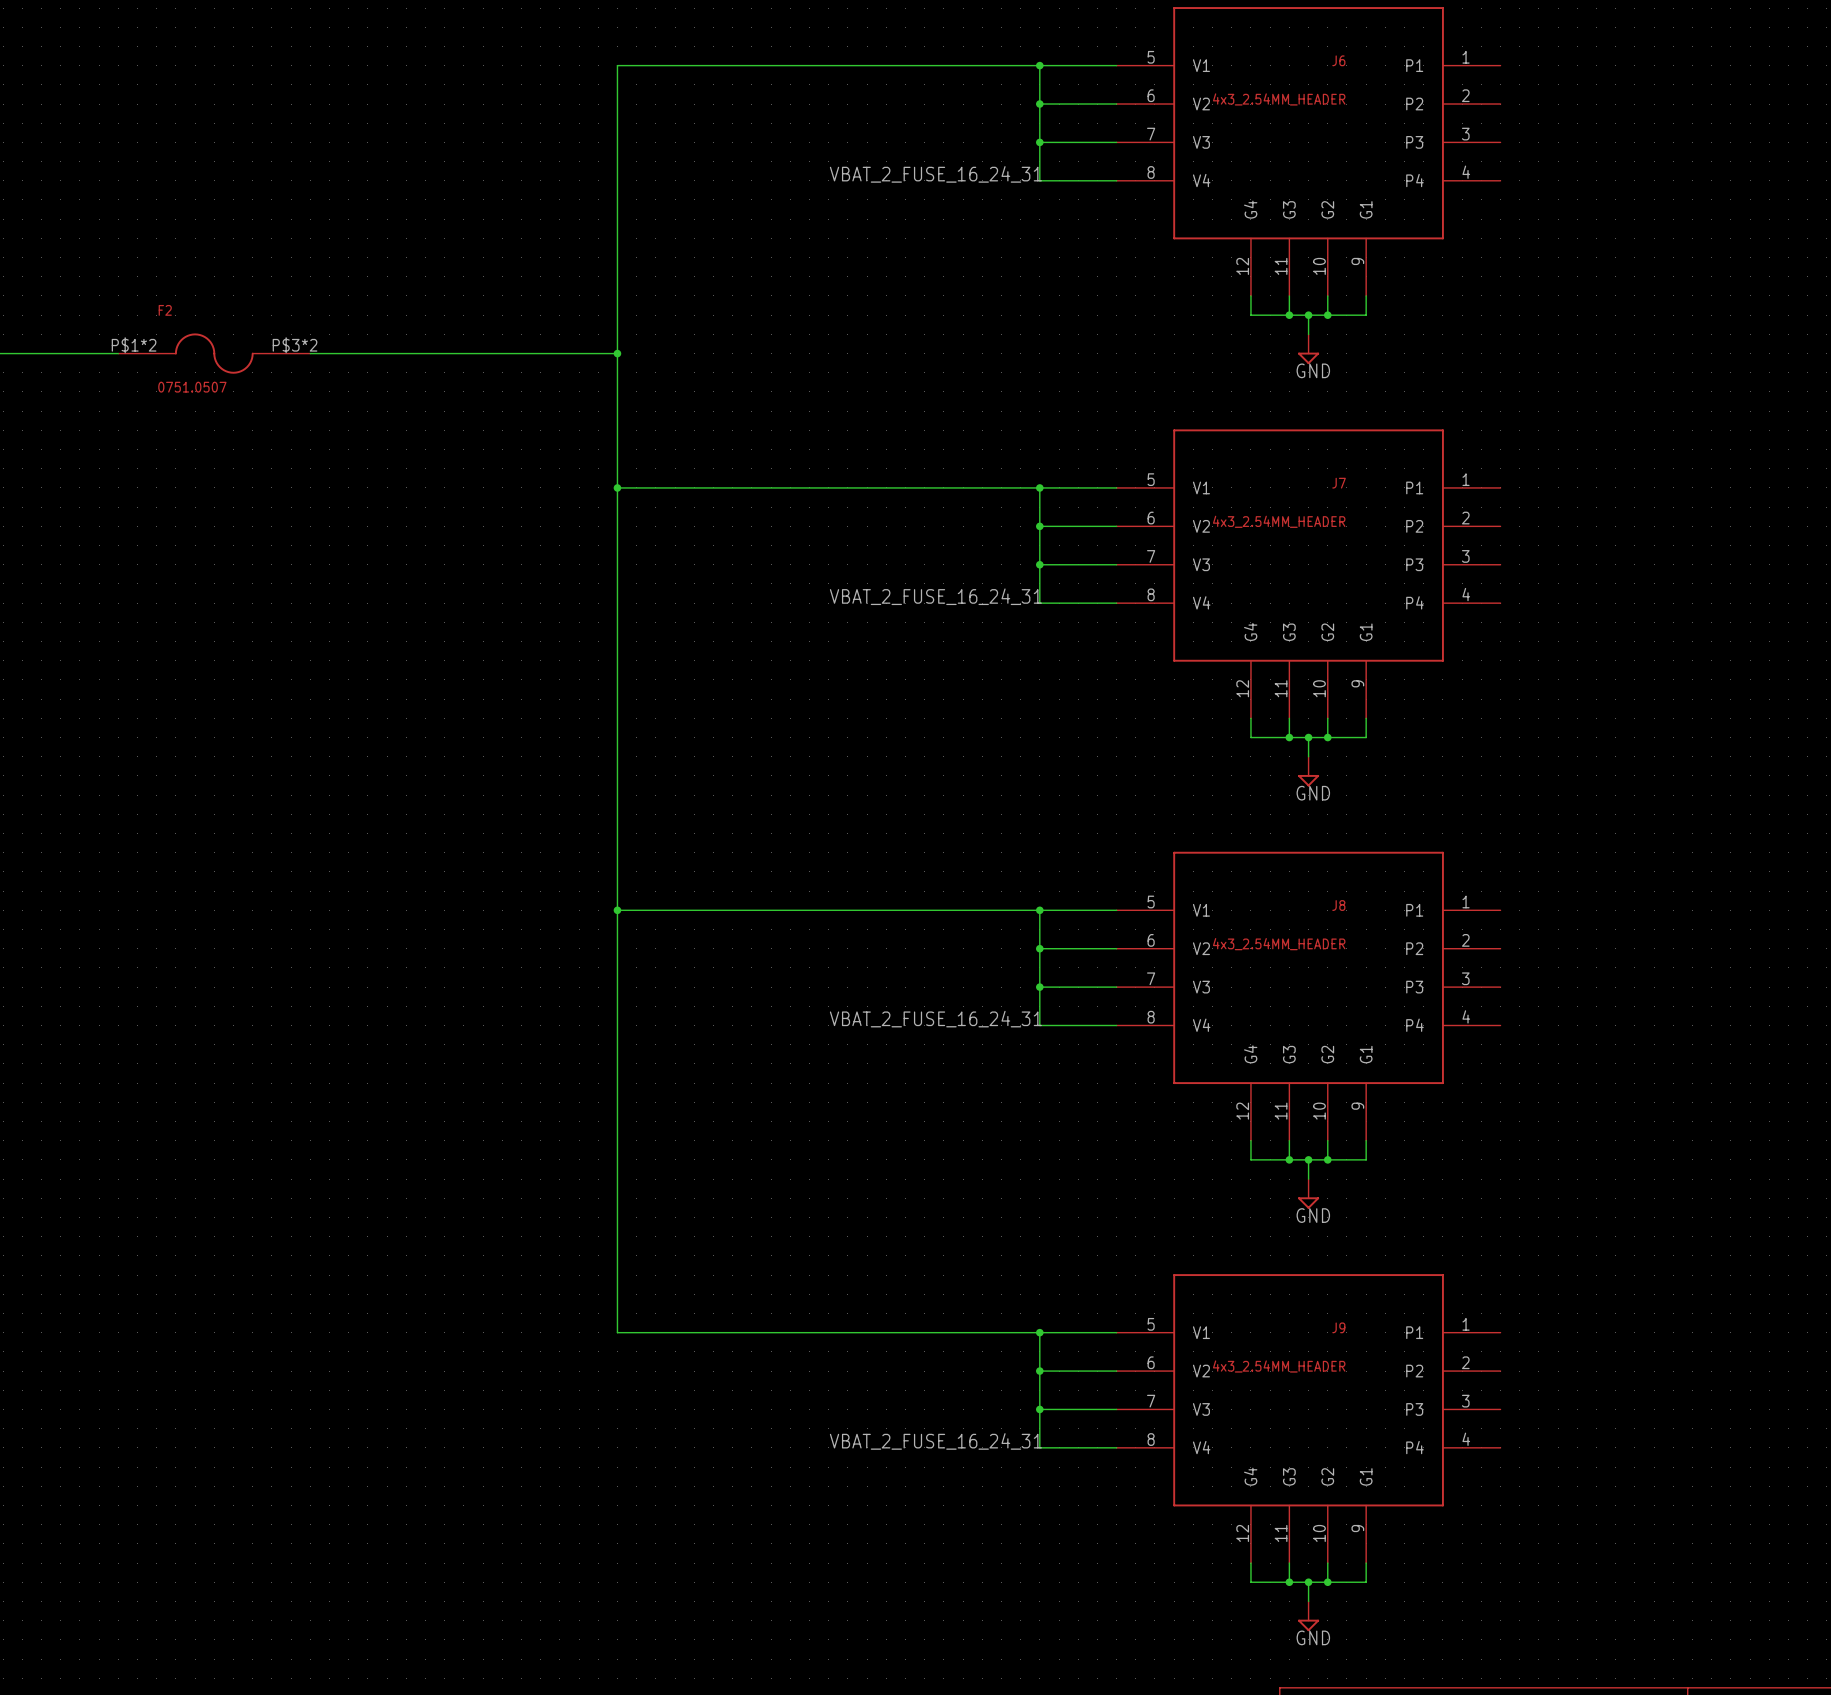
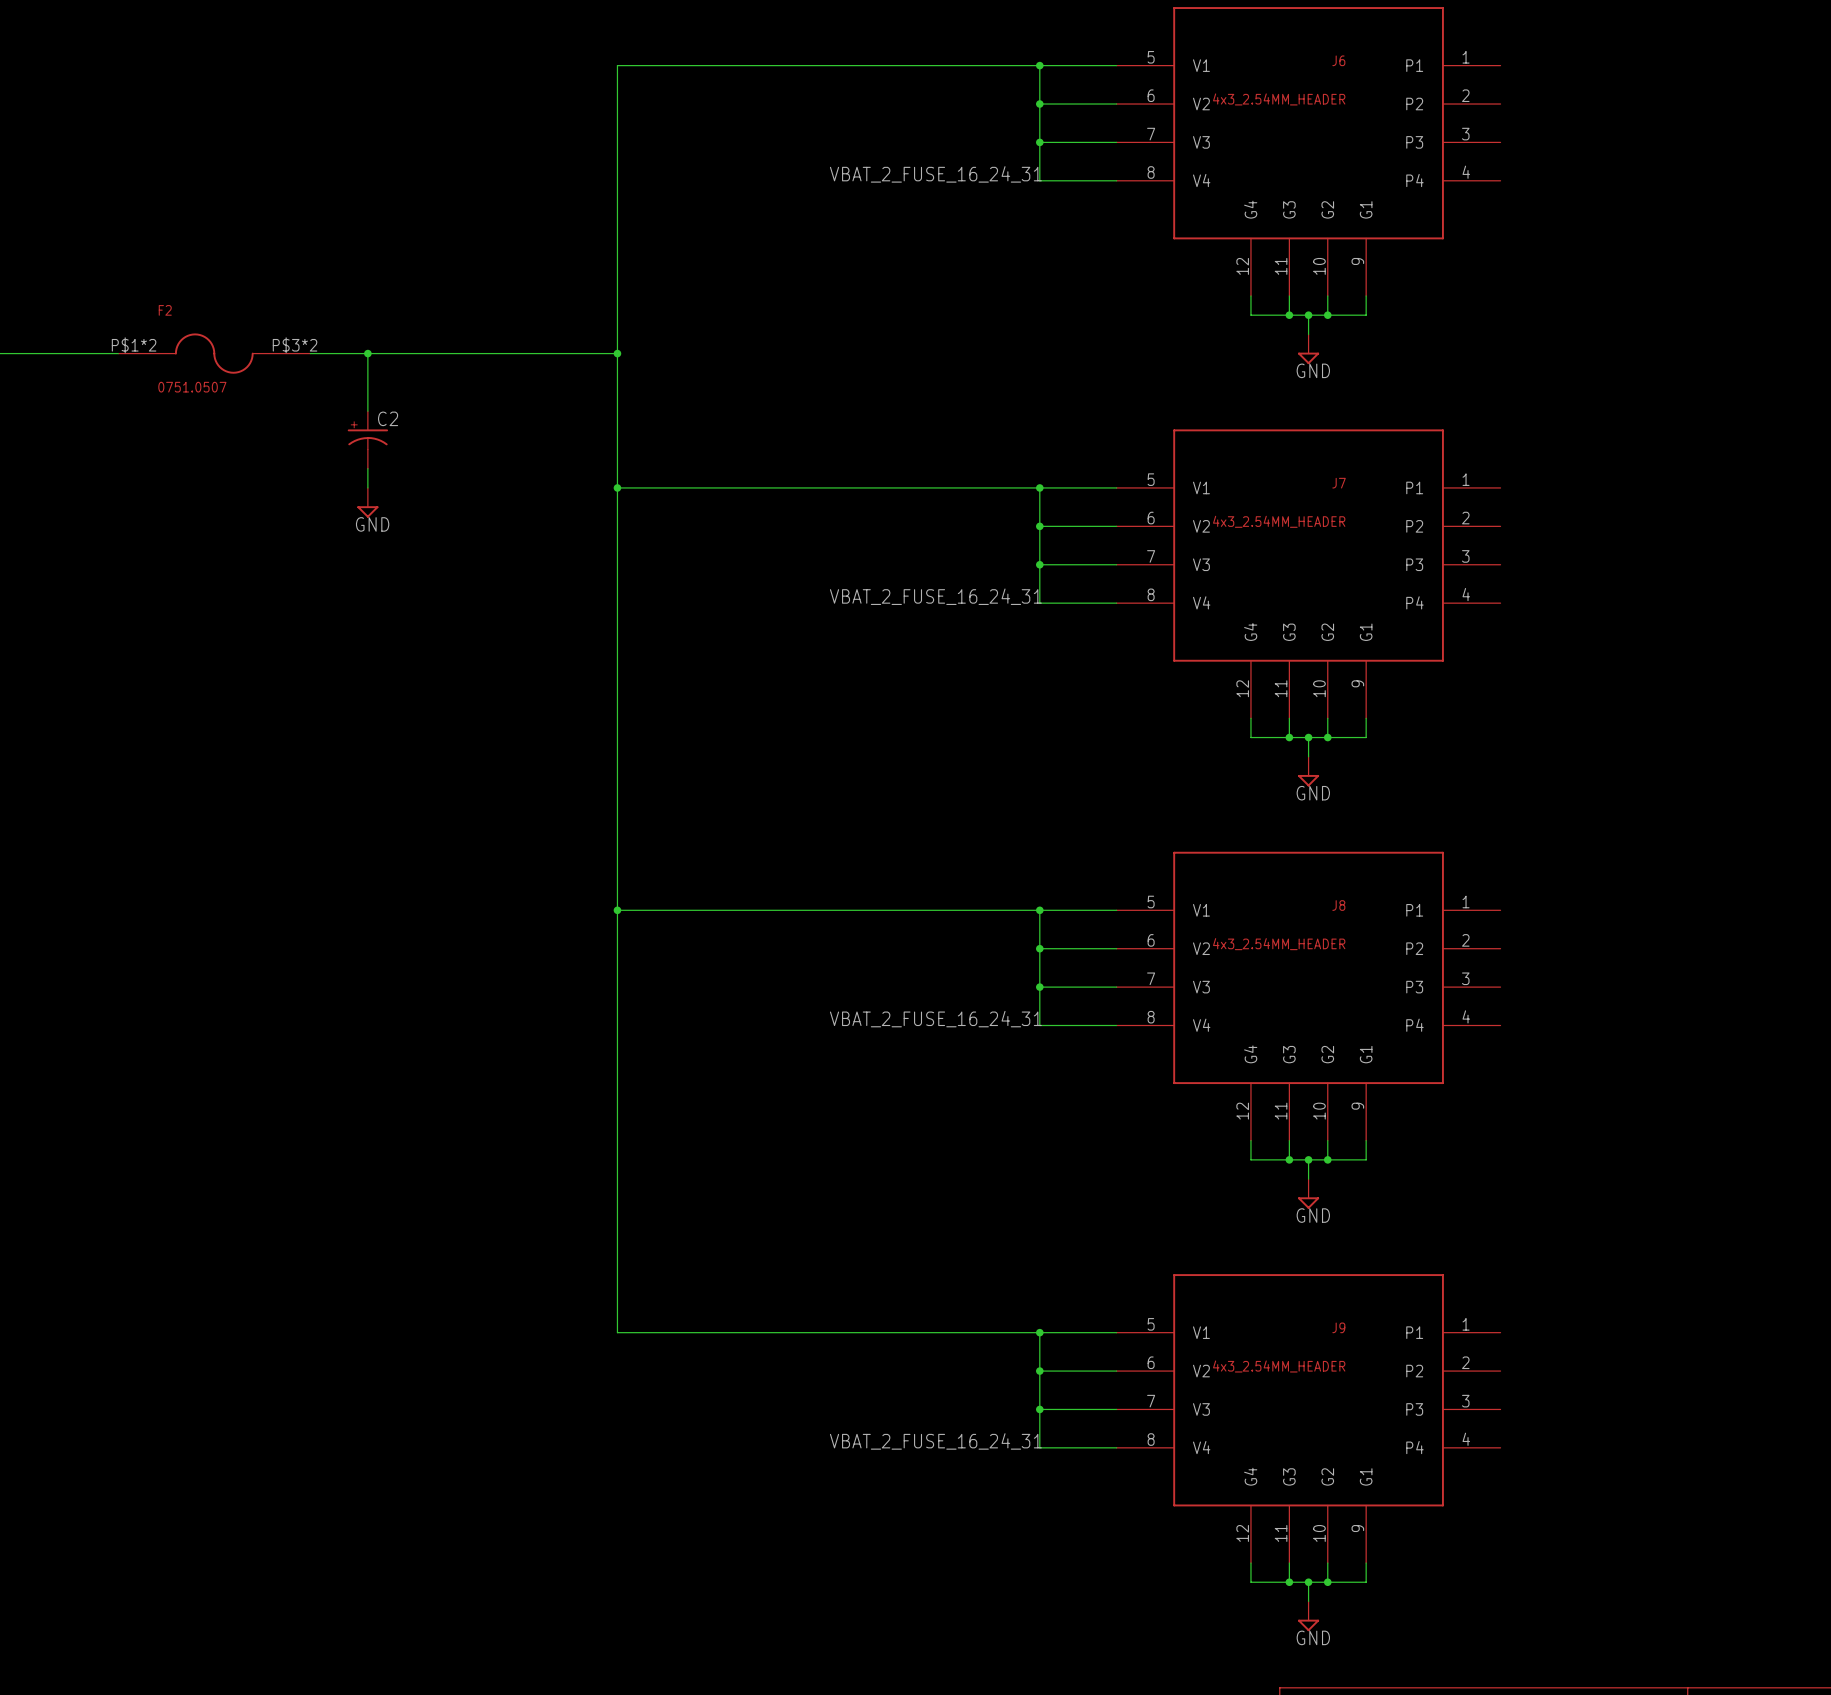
wire: none -> (367, 353) (367, 411)
junction: none -> (367, 353)
C2: none -> (367, 439)
wire: none -> (367, 468) (367, 487)
power symbol: none -> GND (367, 502)

